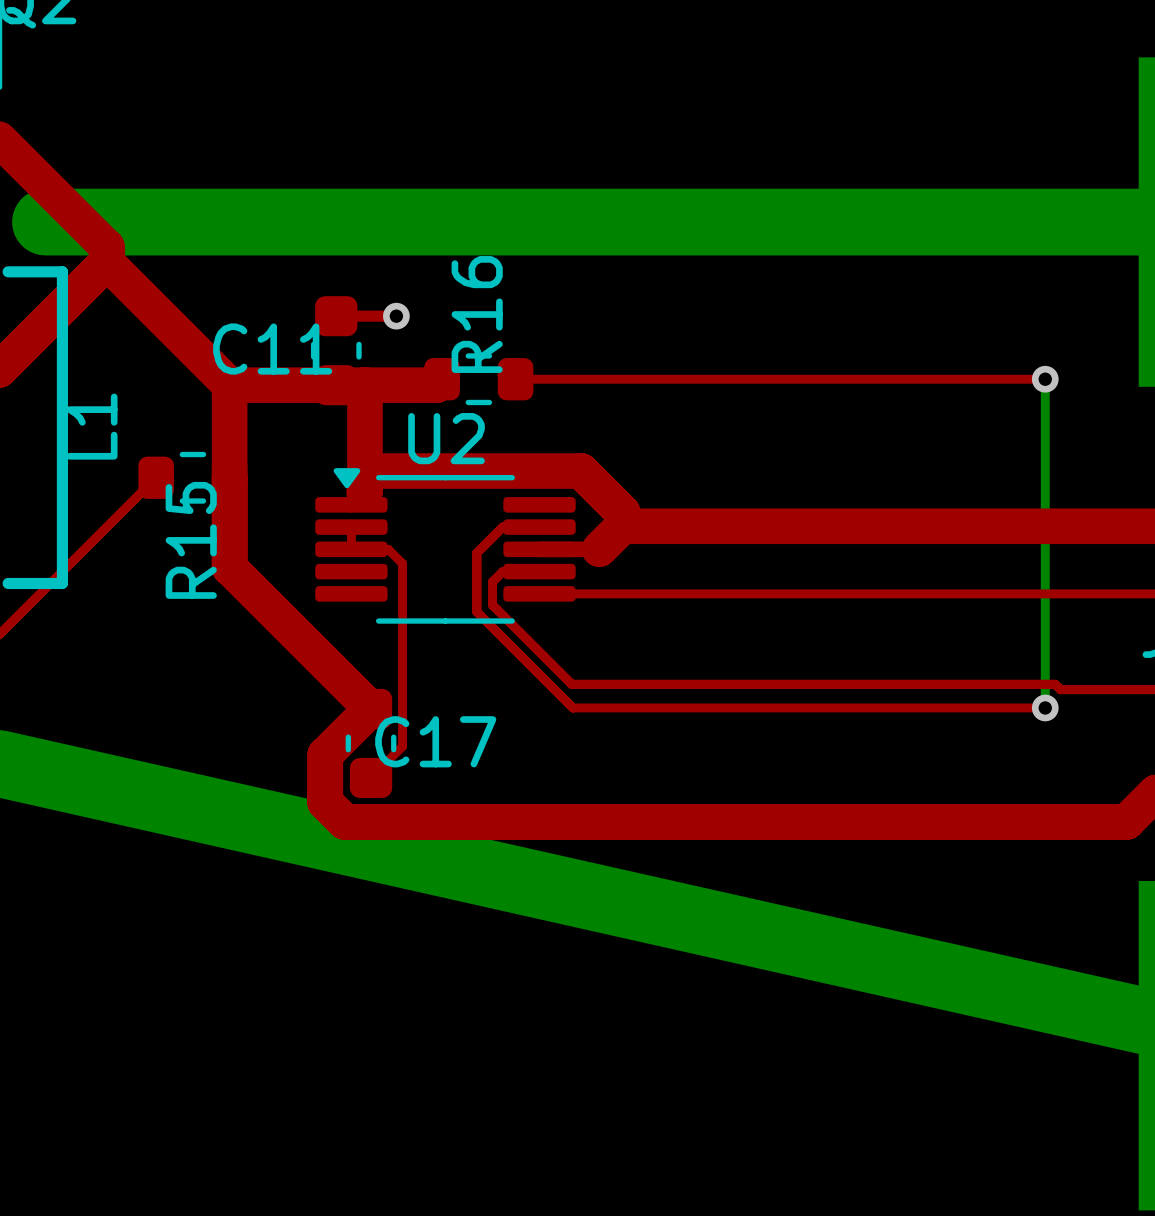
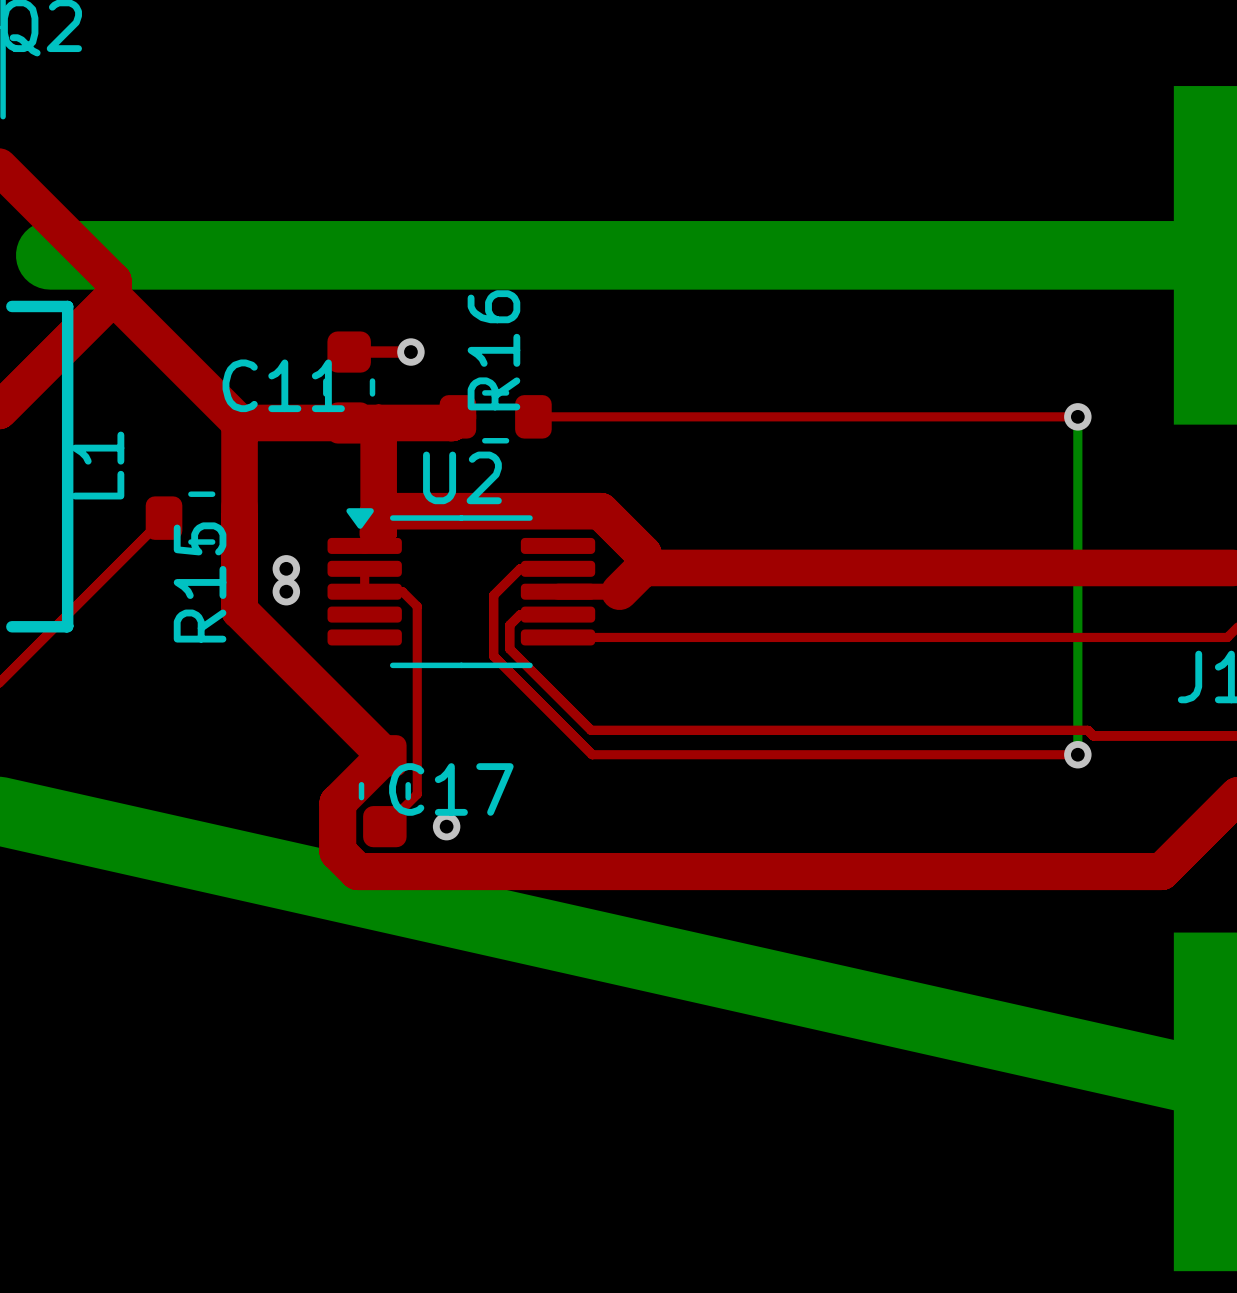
via: none -> (286, 568)
via: none -> (286, 591)
via: none -> (446, 826)

